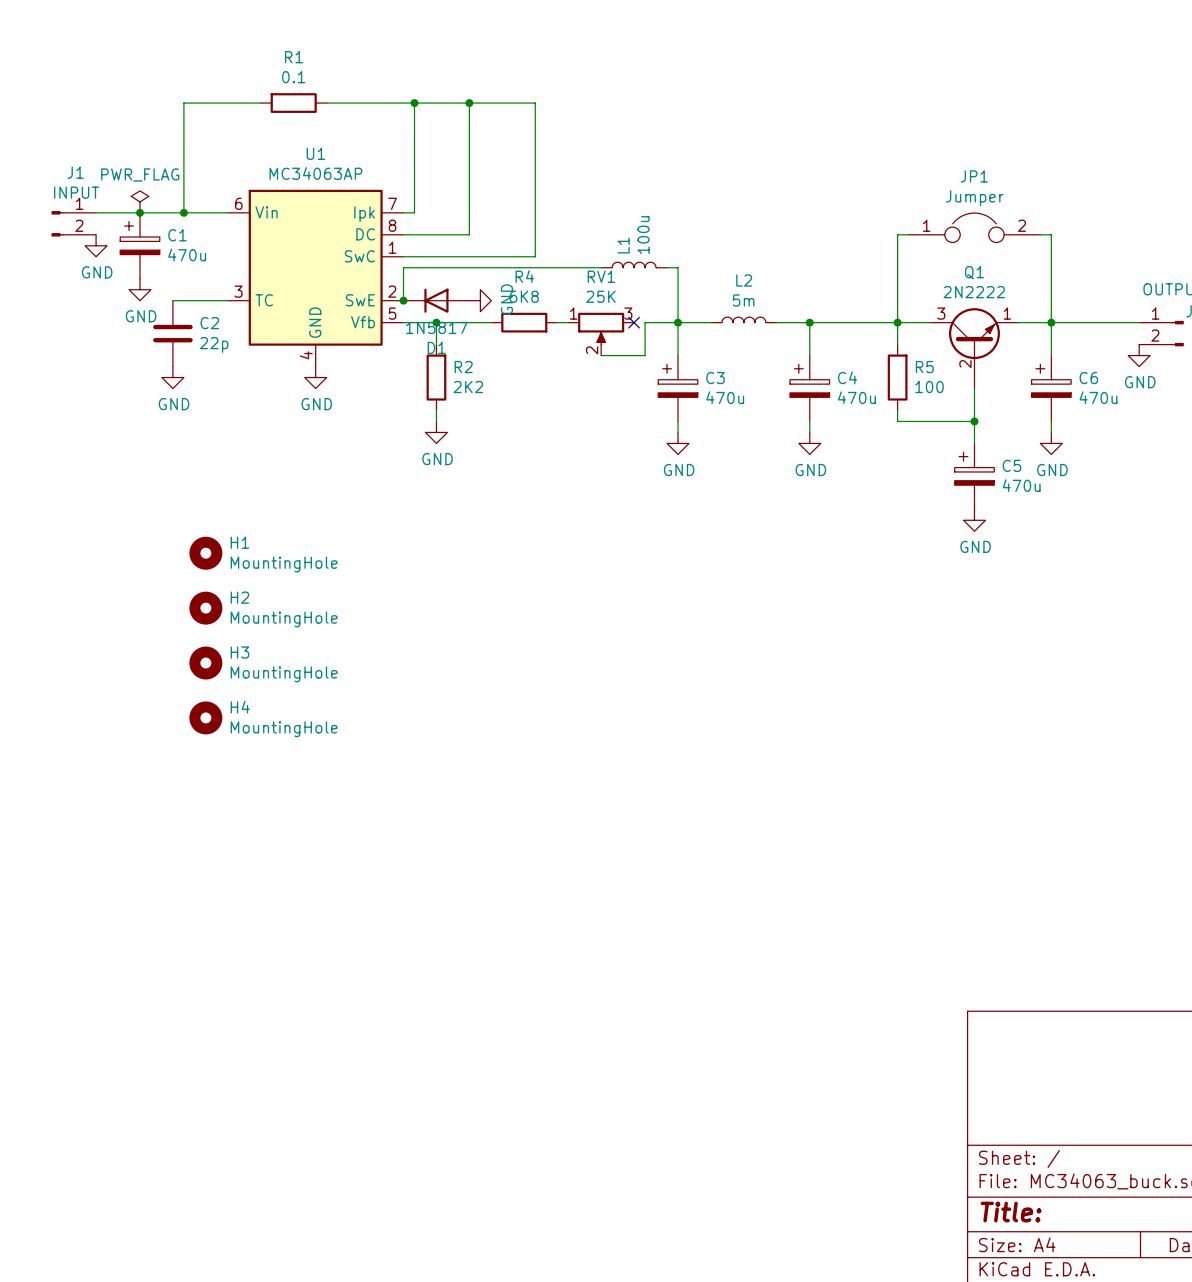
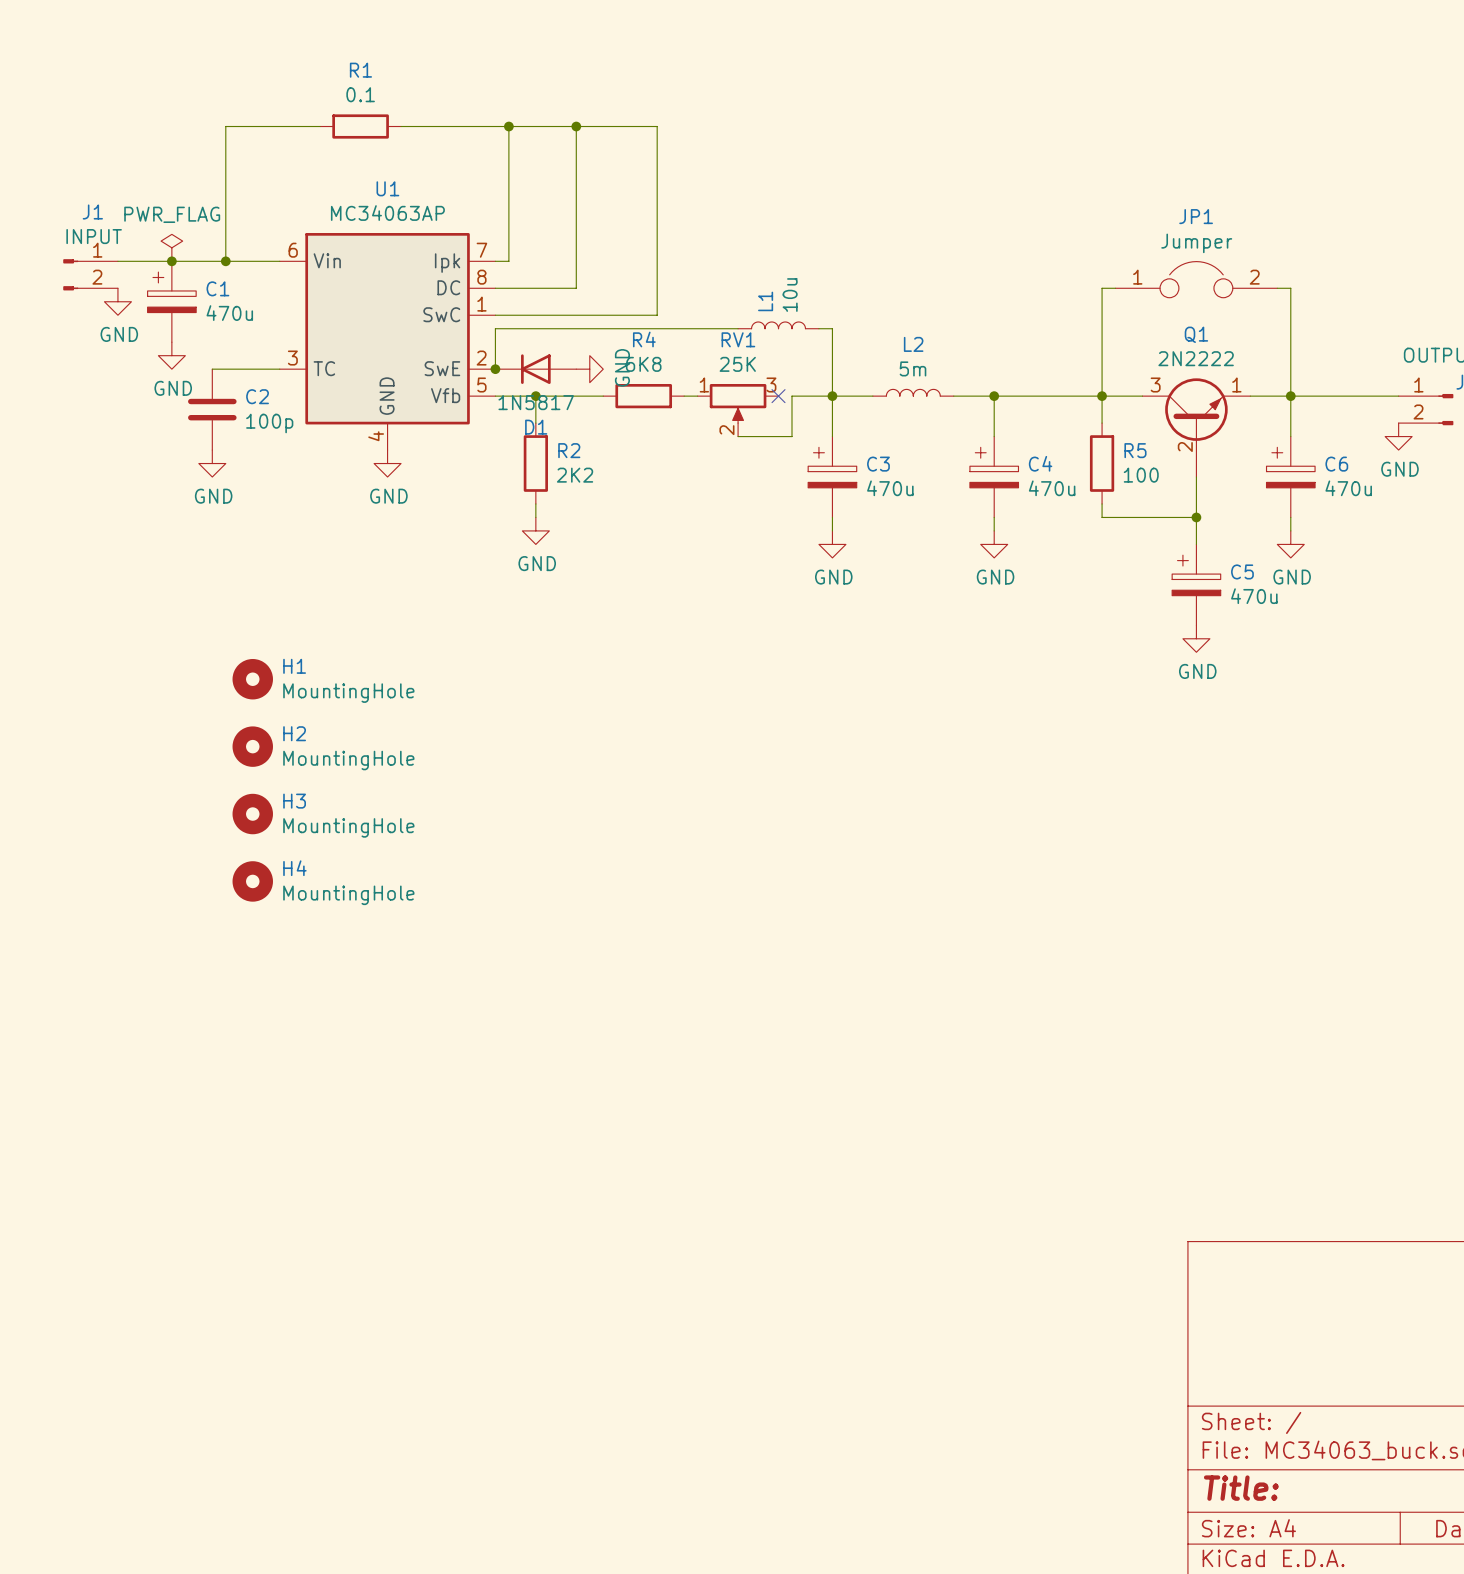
L1 value: 100u (643, 235) -> 10u (790, 295)
C2 value: 22p (214, 344) -> 100p (269, 423)

